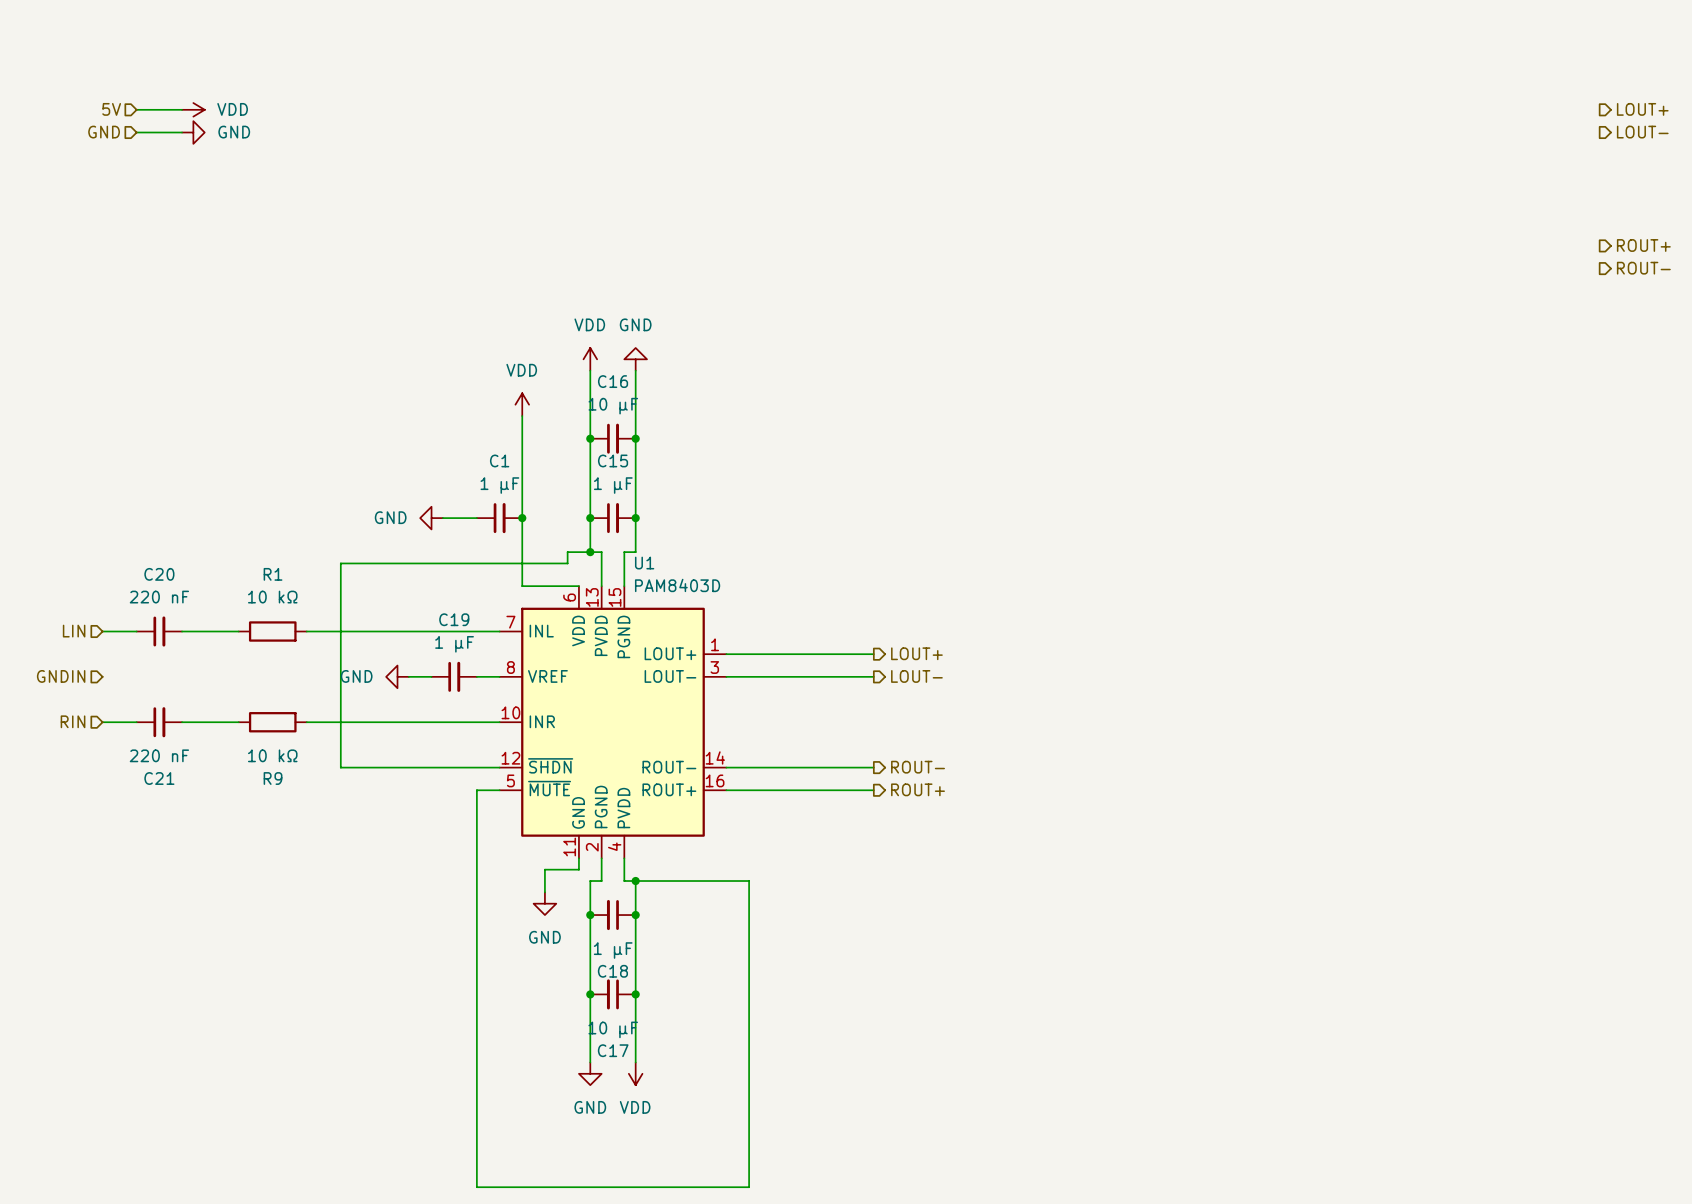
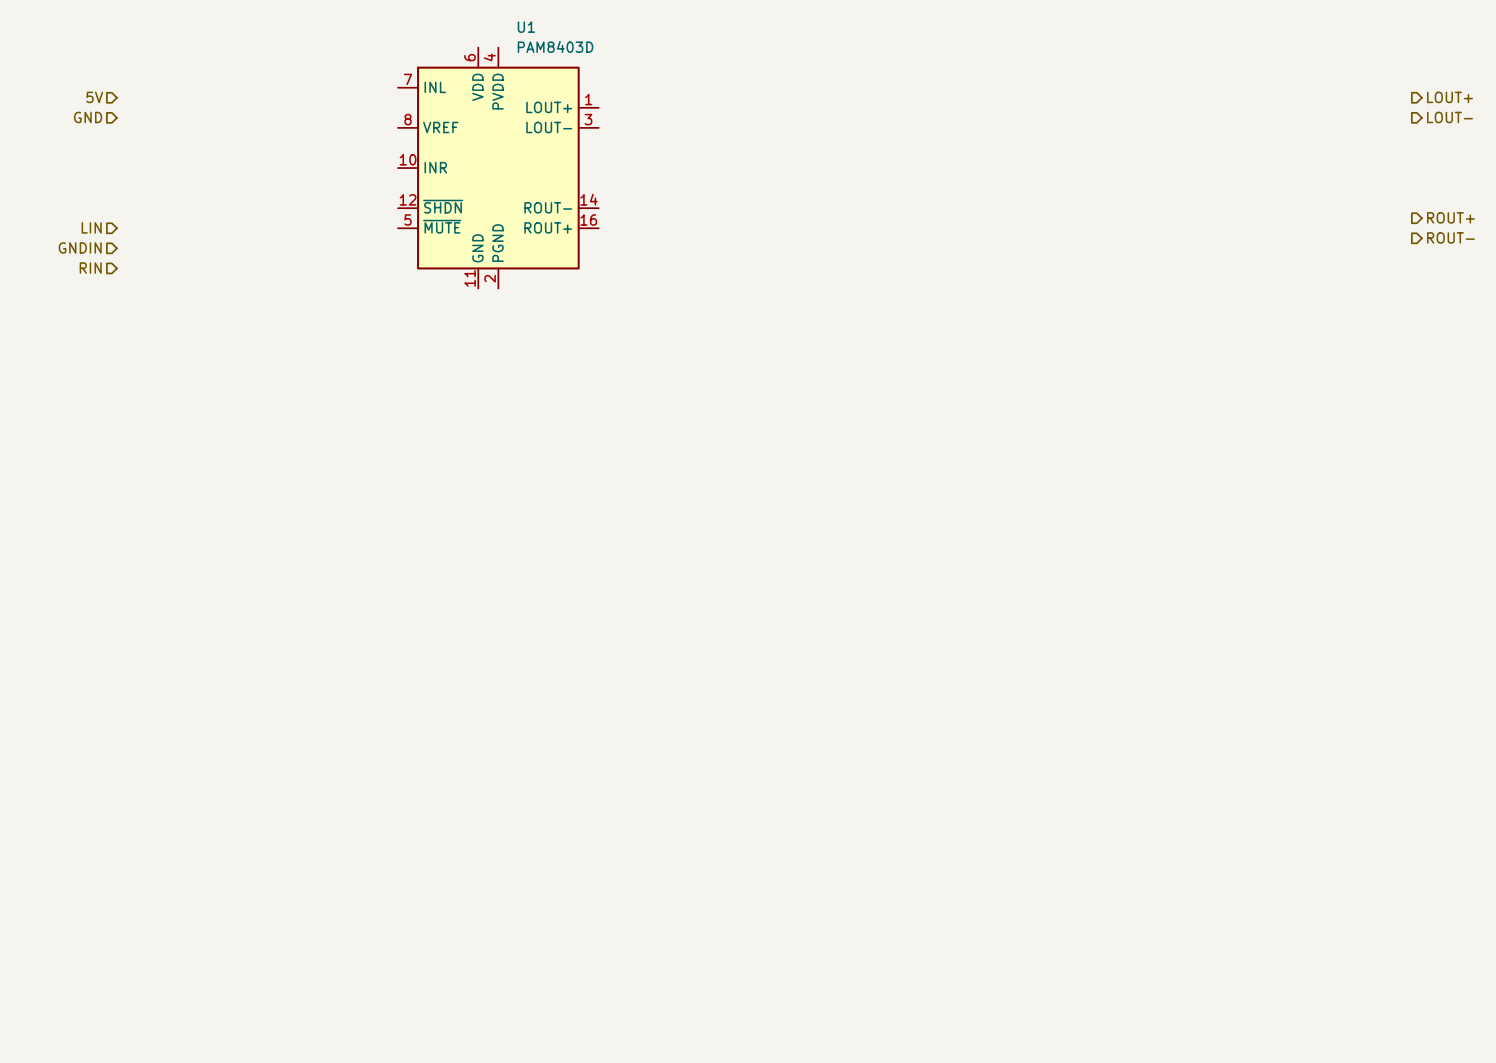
wire: (136, 109) (182, 109) -> none
power symbol: VDD (193, 109) -> none
wire: (136, 132) (182, 132) -> none
power symbol: GND (193, 132) -> none
hierarchical label: none -> LIN (91, 227)
hierarchical label: none -> GNDIN (80, 247)
hierarchical label: none -> RIN (90, 268)
power symbol: VDD (590, 359) -> none
power symbol: GND (635, 359) -> none
wire: (590, 370) (590, 552) -> none
wire: (635, 370) (635, 552) (624, 552) (624, 586) -> none
power symbol: VDD (522, 404) -> none
wire: (522, 416) (522, 586) (578, 586) -> none
junction: (590, 438) -> none
C16: 10 μF (612, 438) -> none
junction: (635, 438) -> none
power symbol: GND (431, 518) -> none
wire: (442, 518) (476, 518) -> none
C1: 1 μF (499, 518) -> none
junction: (522, 518) -> none
junction: (590, 518) -> none
C15: 1 μF (612, 518) -> none
junction: (635, 518) -> none
junction: (590, 552) -> none
U1 symbol: [499, 586, 727, 859] -> [397, 47, 599, 289]
wire: (601, 586) (601, 552) (567, 552) (567, 563) (340, 563) (340, 767) (499, 767) -> none
hierarchical label: LIN (74, 631) -> none
wire: (102, 631) (136, 631) -> none
C20: 220 nF (159, 631) -> none
wire: (182, 631) (238, 631) -> none
R1: 10 kΩ (272, 631) -> none
wire: (306, 631) (499, 631) -> none
hierarchical label: LOUT+ (916, 653) -> none
wire: (726, 654) (873, 654) -> none
hierarchical label: GNDIN (61, 676) -> none
power symbol: GND (397, 676) -> none
wire: (408, 676) (431, 676) -> none
C19: 1 μF (454, 676) -> none
wire: (476, 676) (499, 676) -> none
wire: (726, 676) (873, 676) -> none
hierarchical label: LOUT- (916, 676) -> none
hierarchical label: RIN (73, 721) -> none
wire: (102, 722) (136, 722) -> none
C21: 220 nF (159, 722) -> none
wire: (182, 722) (238, 722) -> none
R9: 10 kΩ (272, 722) -> none
wire: (306, 722) (499, 722) -> none
wire: (726, 767) (873, 767) -> none
hierarchical label: ROUT- (918, 767) -> none
hierarchical label: ROUT+ (918, 789) -> none
wire: (499, 790) (476, 790) (476, 1187) (749, 1187) (749, 881) (624, 881) (624, 858) -> none
wire: (726, 790) (873, 790) -> none
wire: (578, 858) (578, 869) (544, 869) (544, 892) -> none
wire: (601, 858) (601, 881) (590, 881) (590, 1062) -> none
wire: (635, 881) (635, 1062) -> none
junction: (635, 881) -> none
power symbol: GND (544, 903) -> none
junction: (590, 915) -> none
C18: 1 μF (612, 915) -> none
junction: (635, 915) -> none
junction: (590, 994) -> none
C17: 10 μF (612, 994) -> none
junction: (635, 994) -> none
power symbol: GND (590, 1073) -> none
power symbol: VDD (635, 1073) -> none

